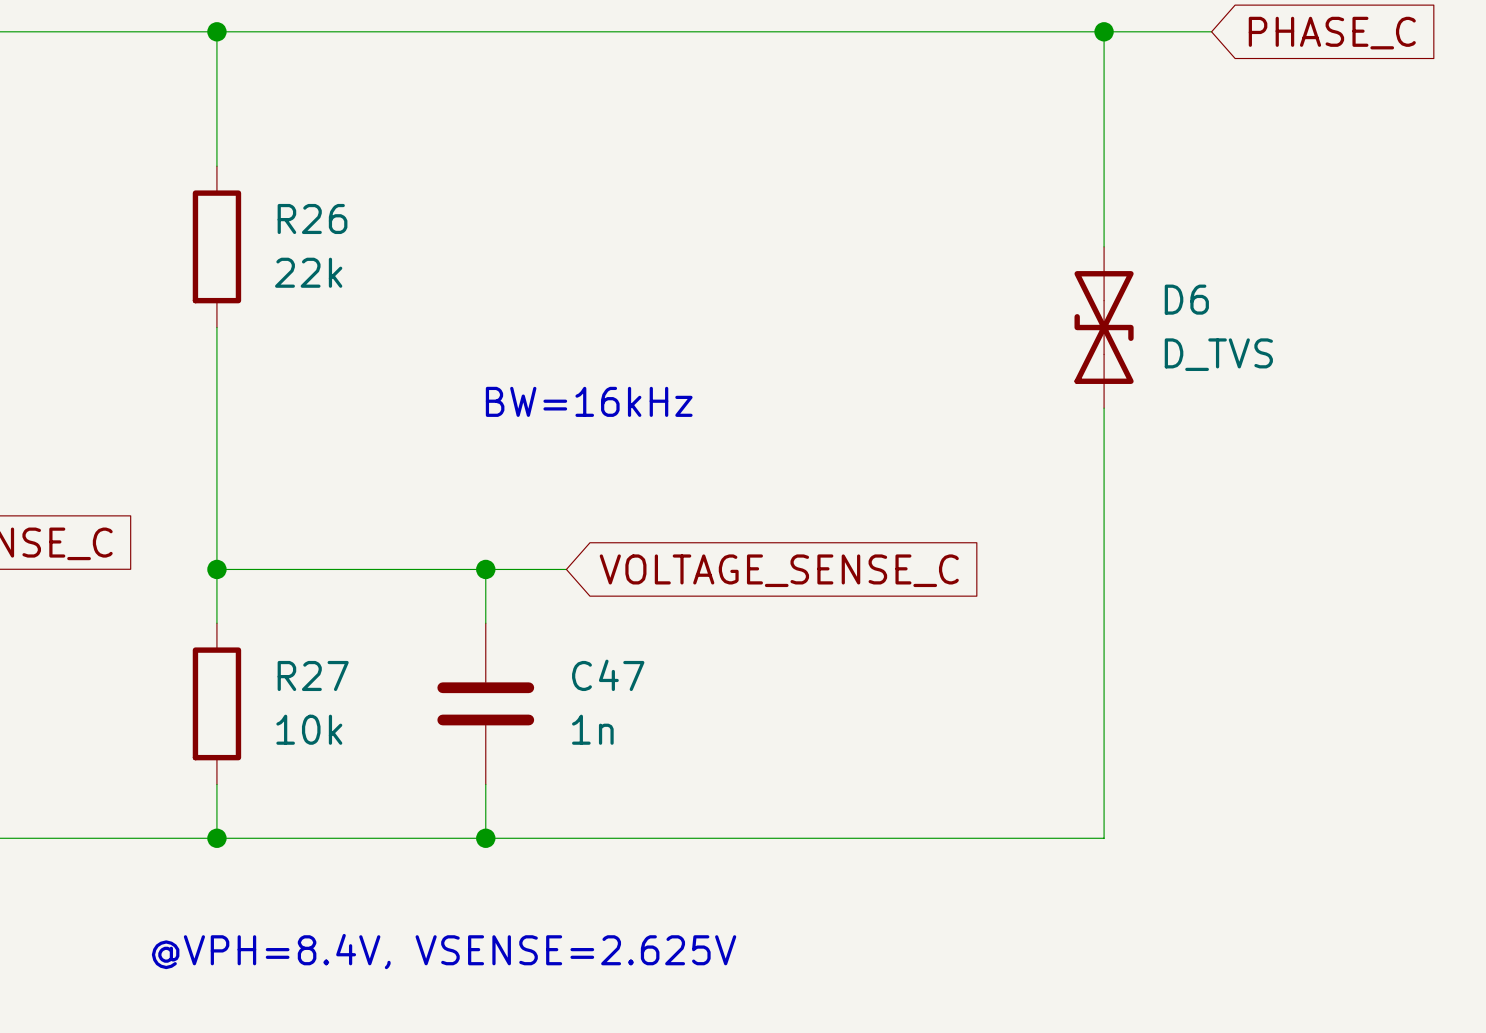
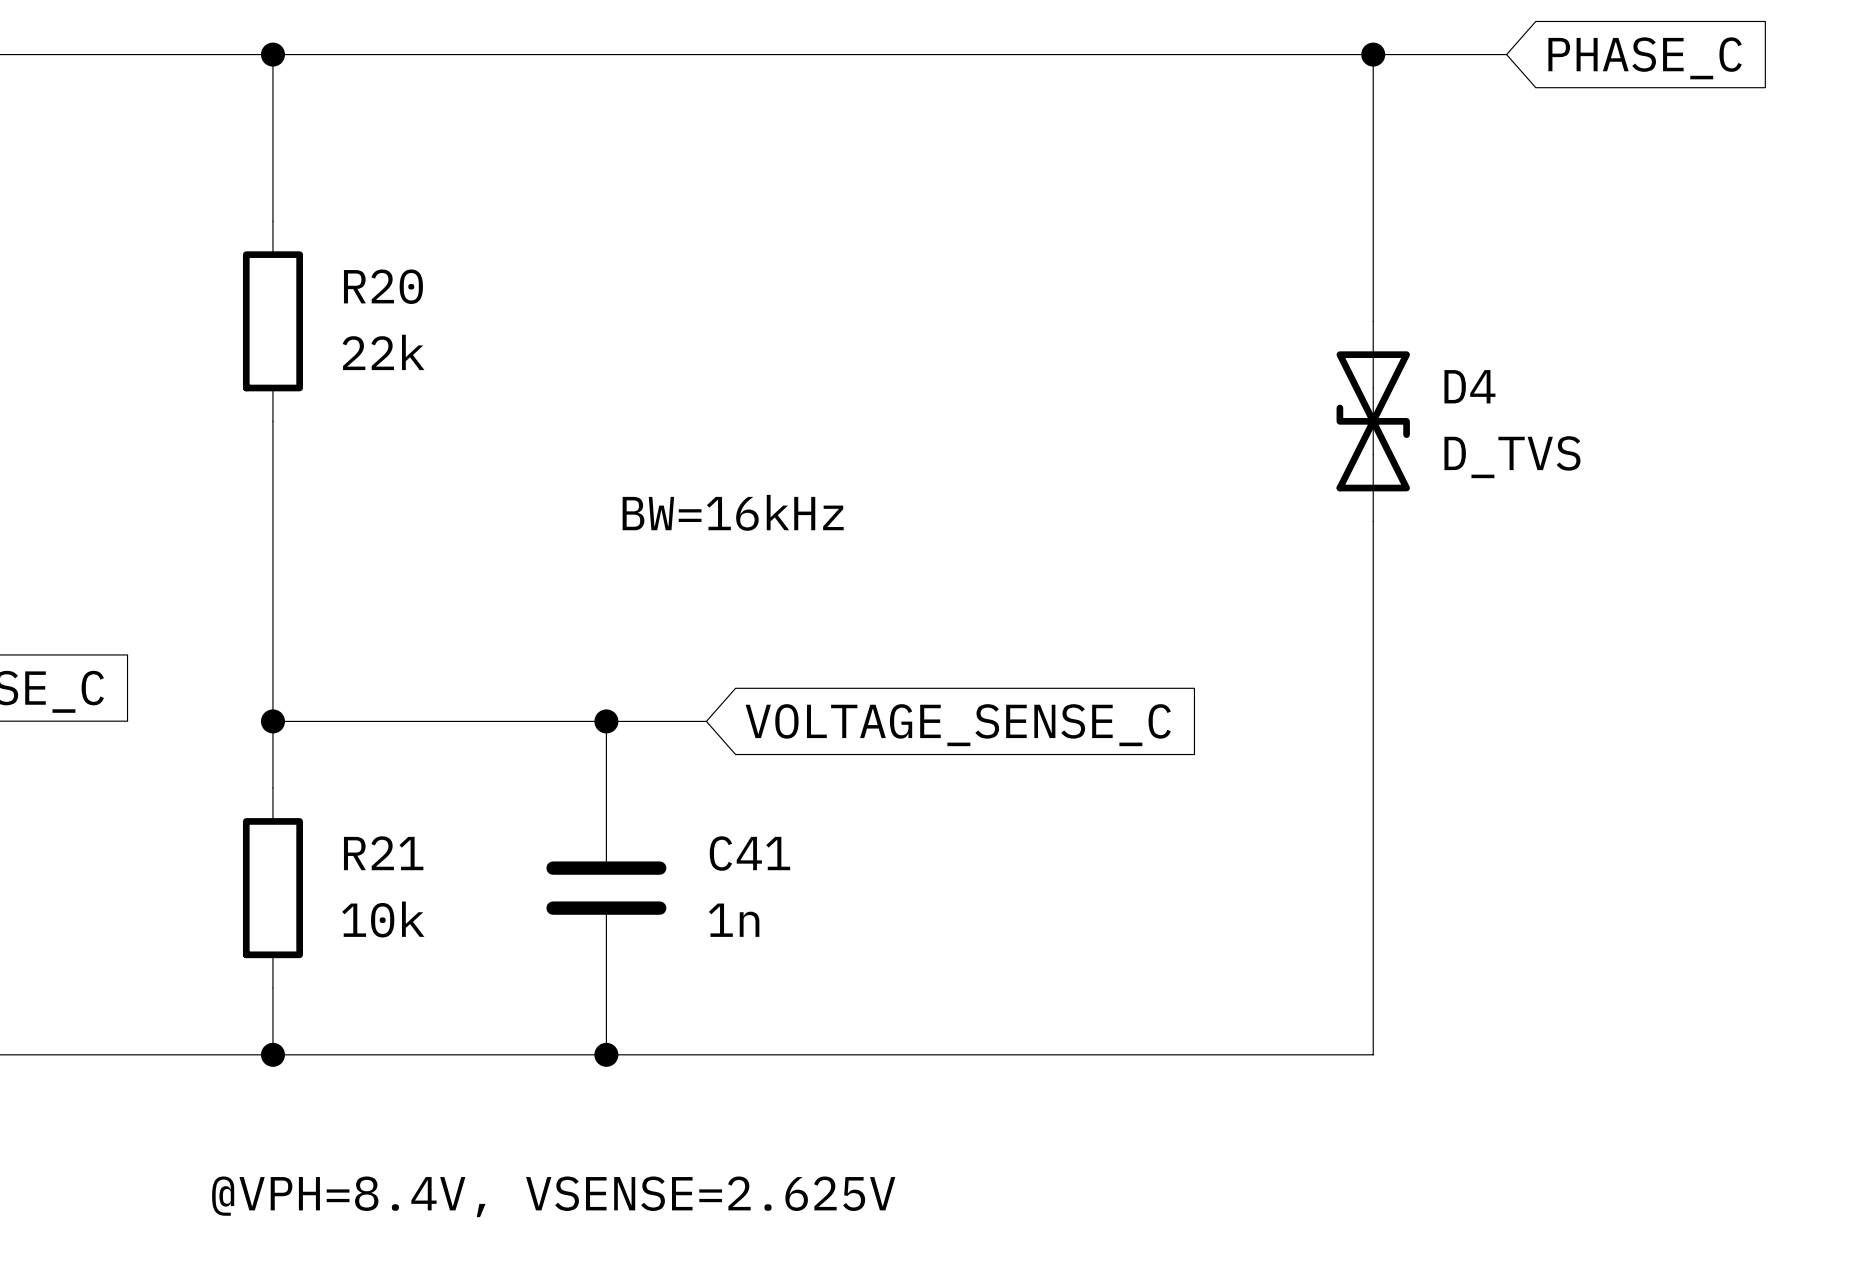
R26 name: R26 (312, 218) -> R20 (383, 286)
D6 name: D6 (1186, 299) -> D4 (1469, 386)
R27 name: R27 (313, 675) -> R21 (383, 853)
C47 name: C47 (608, 675) -> C41 (749, 853)

